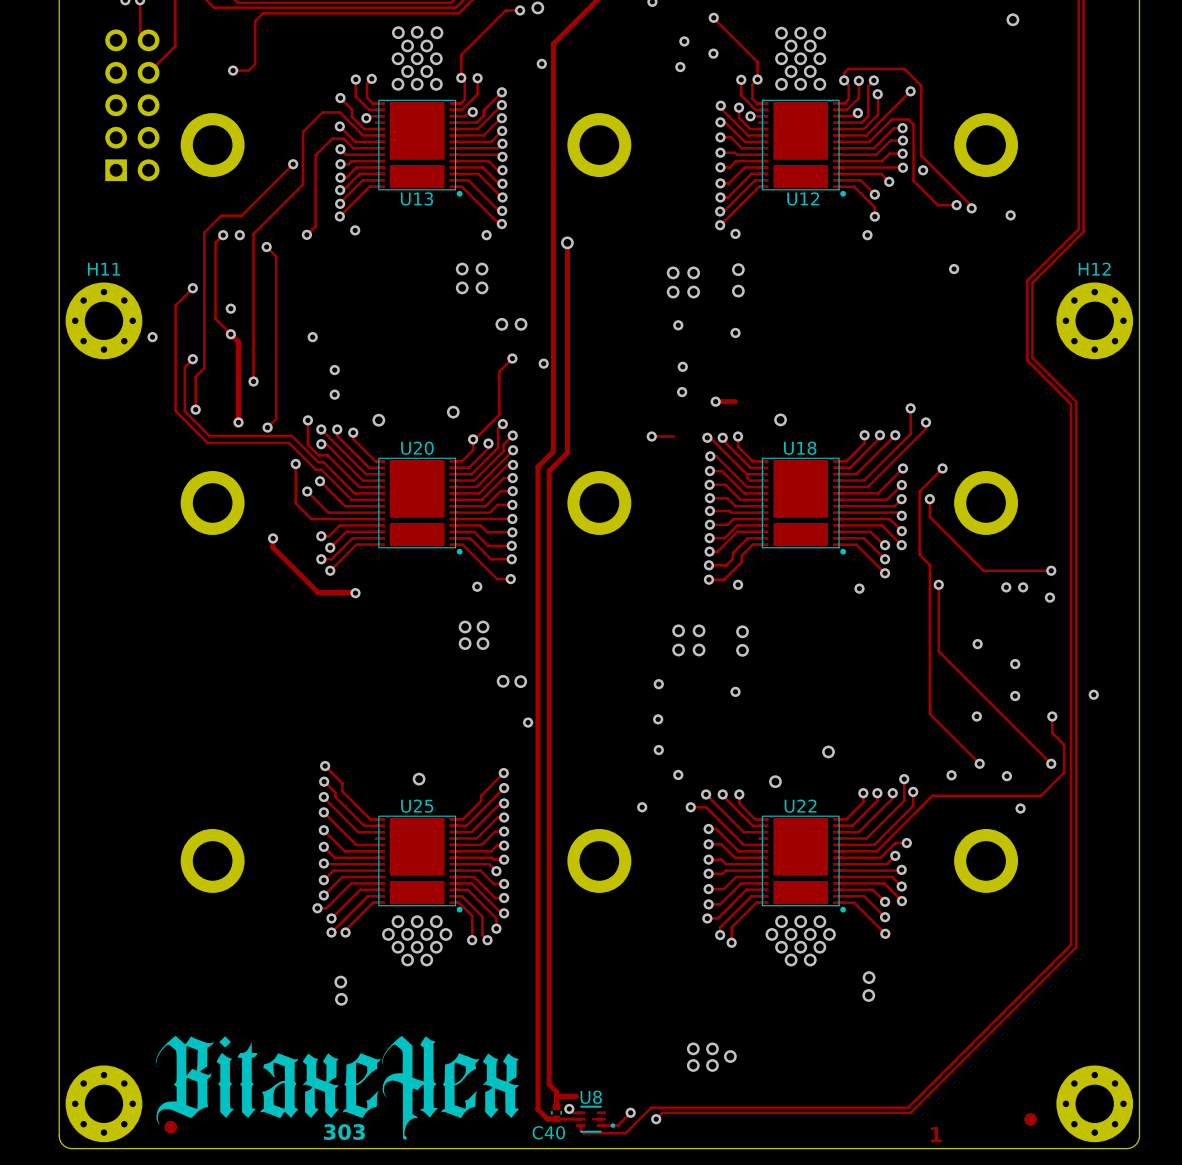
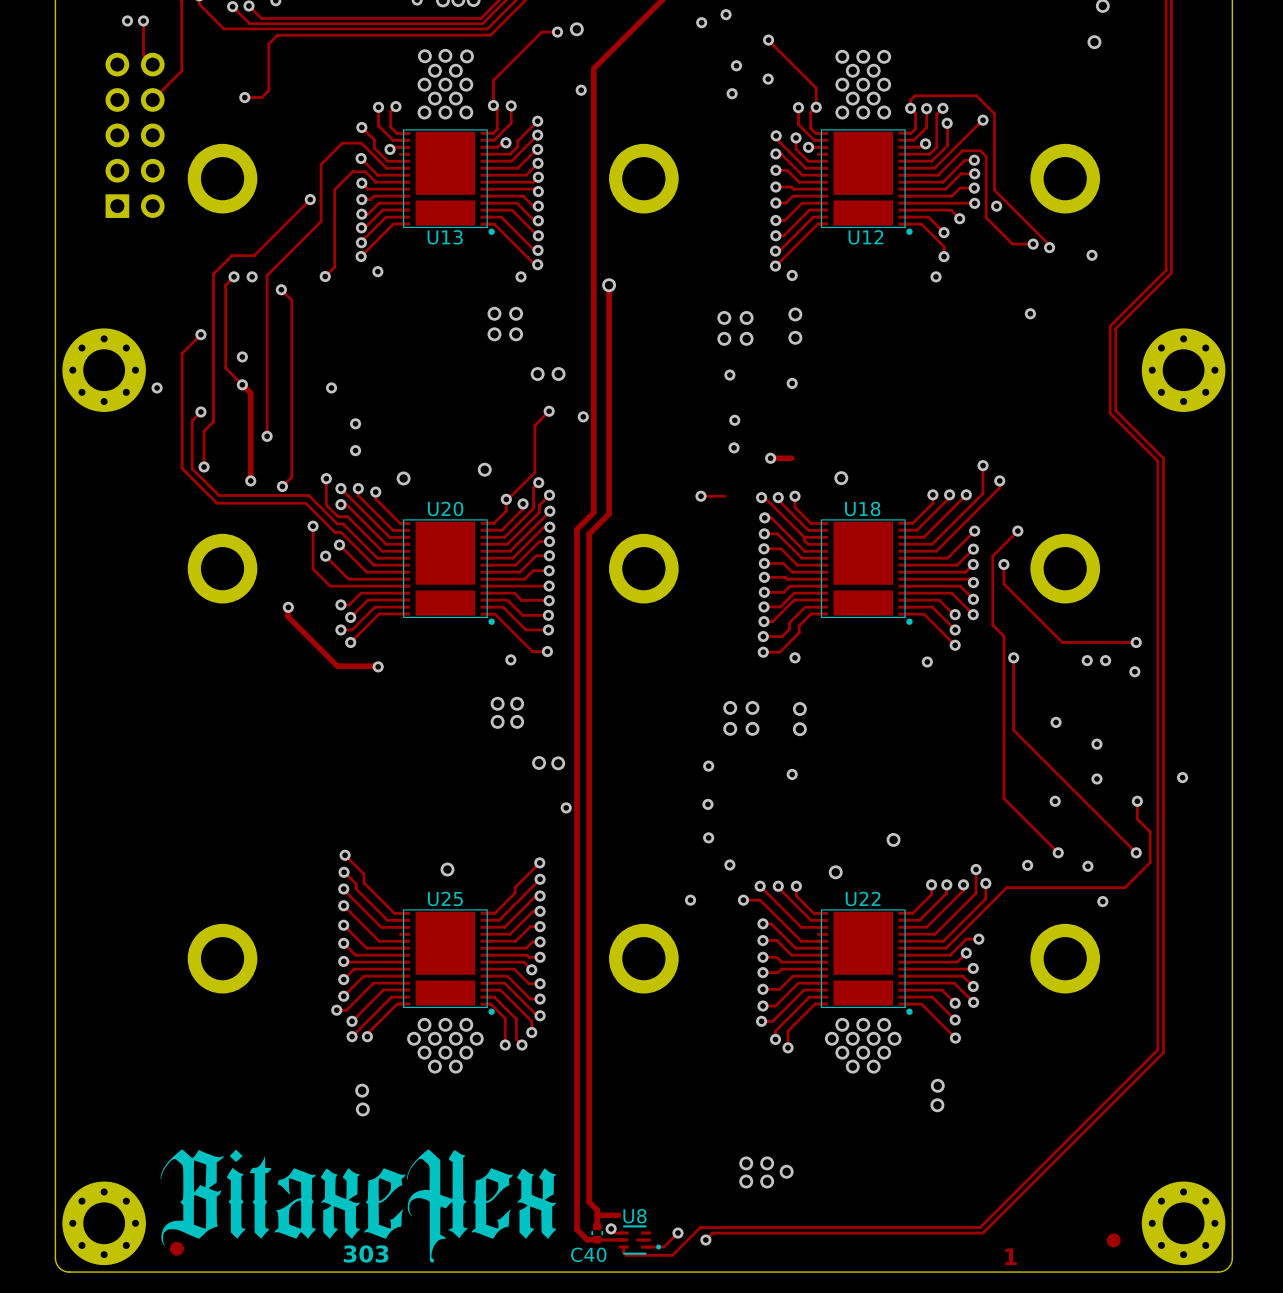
H11 name: H11 (104, 269) -> none
H12 name: H12 (1094, 269) -> none

